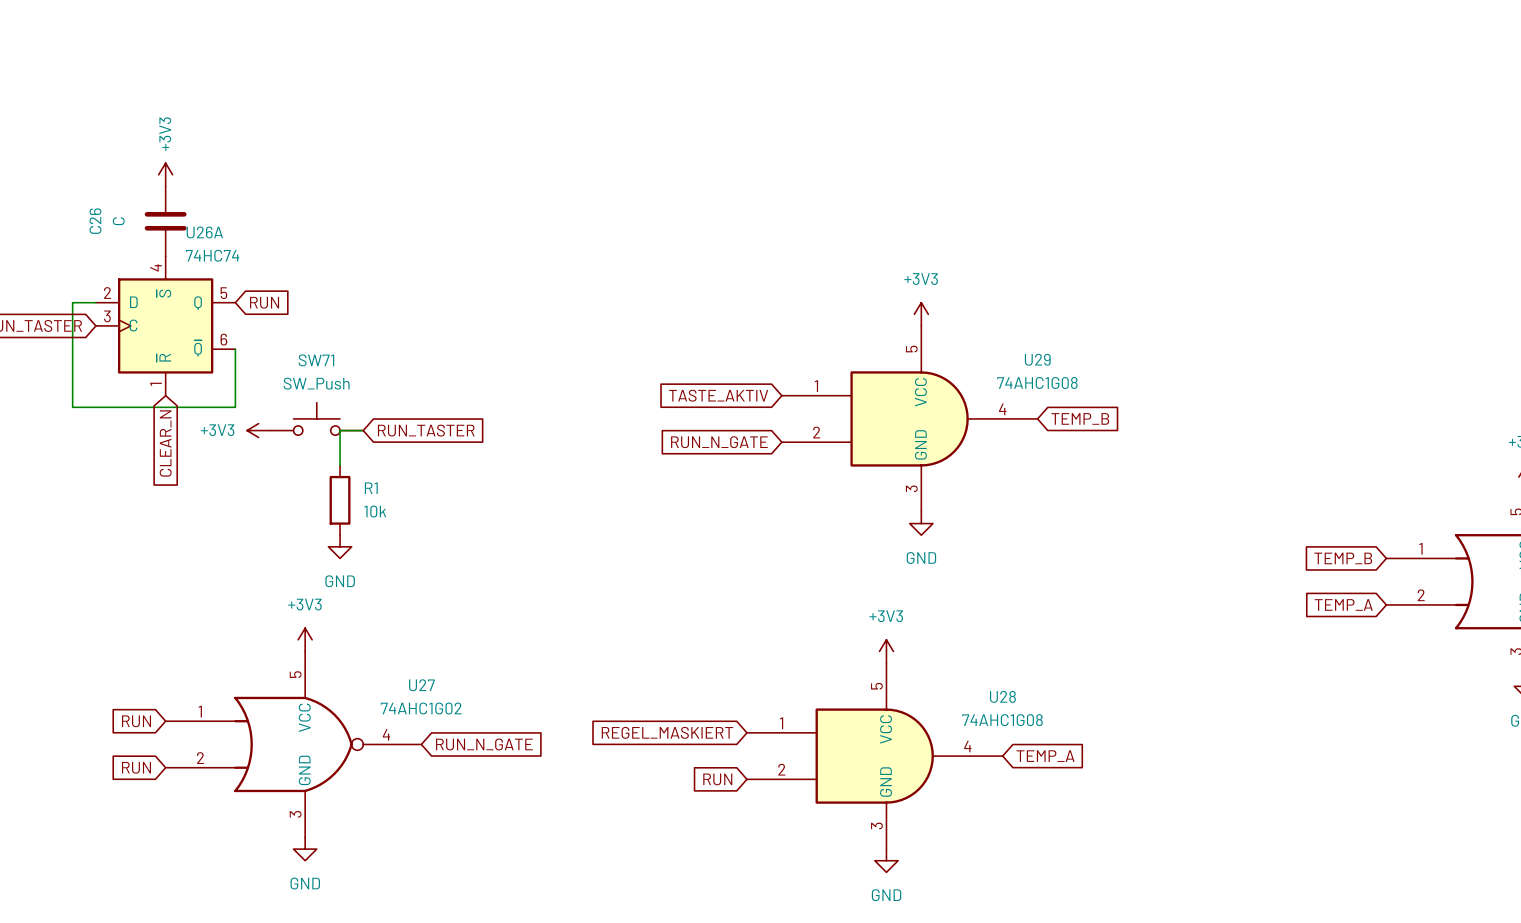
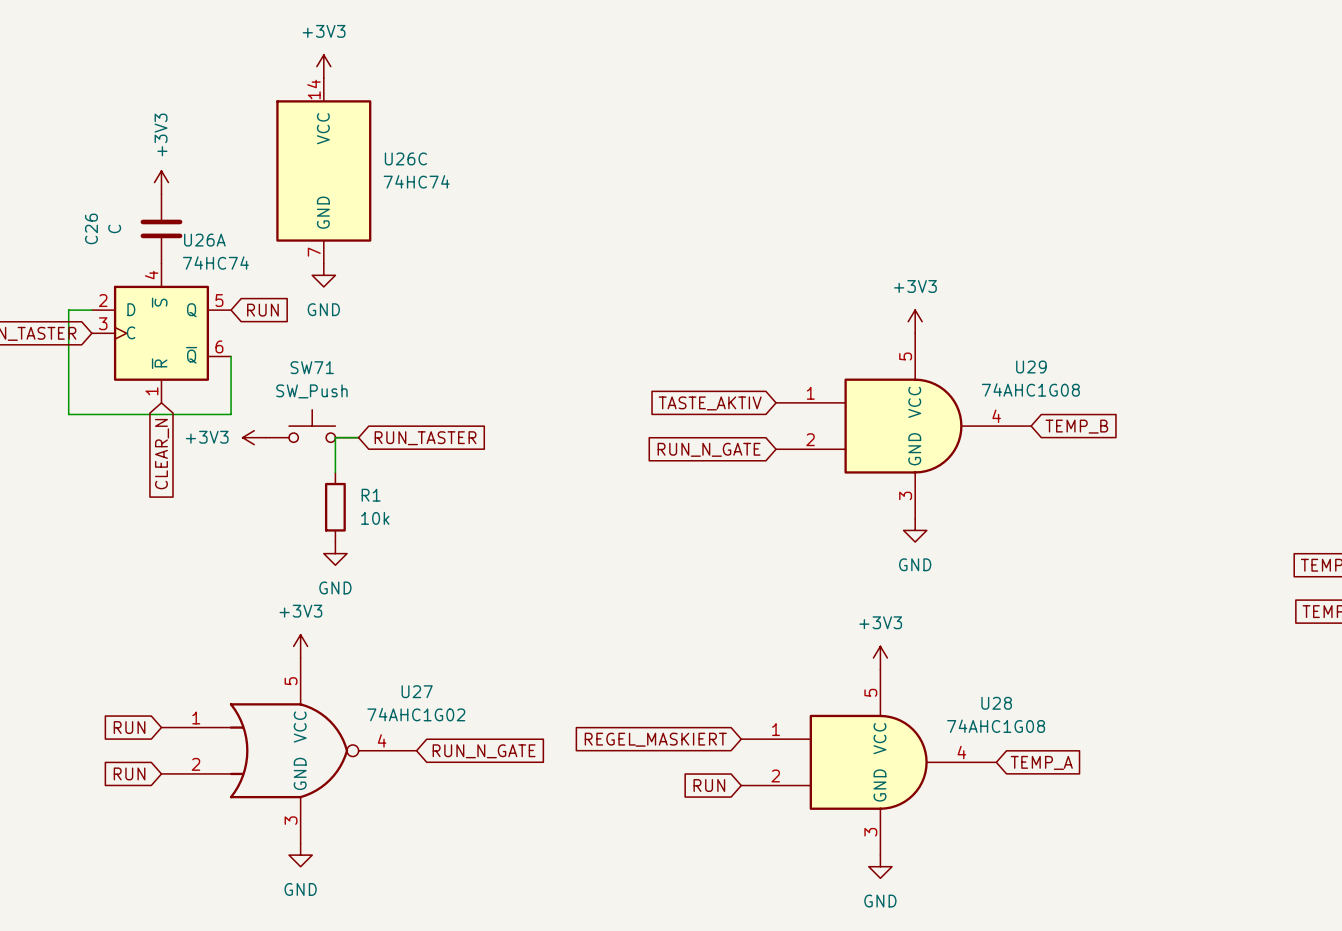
power symbol: none -> +3V3 (323, 66)
U26C: none -> 74HC74 (323, 170)
power symbol: none -> GND (323, 275)

